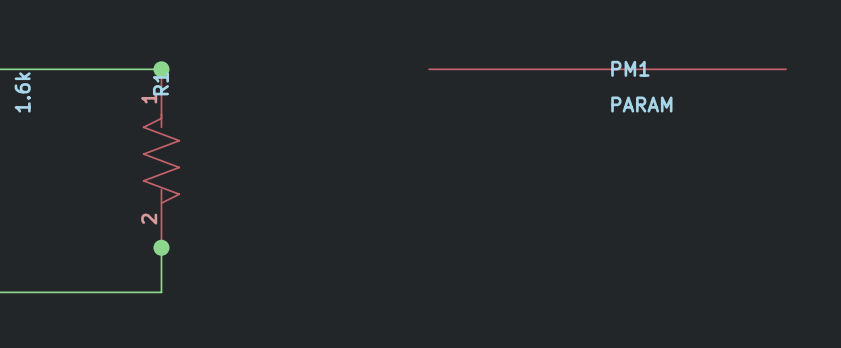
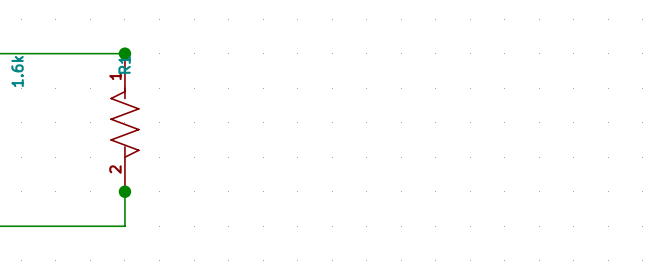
PM1: PARAM (607, 69) -> none

